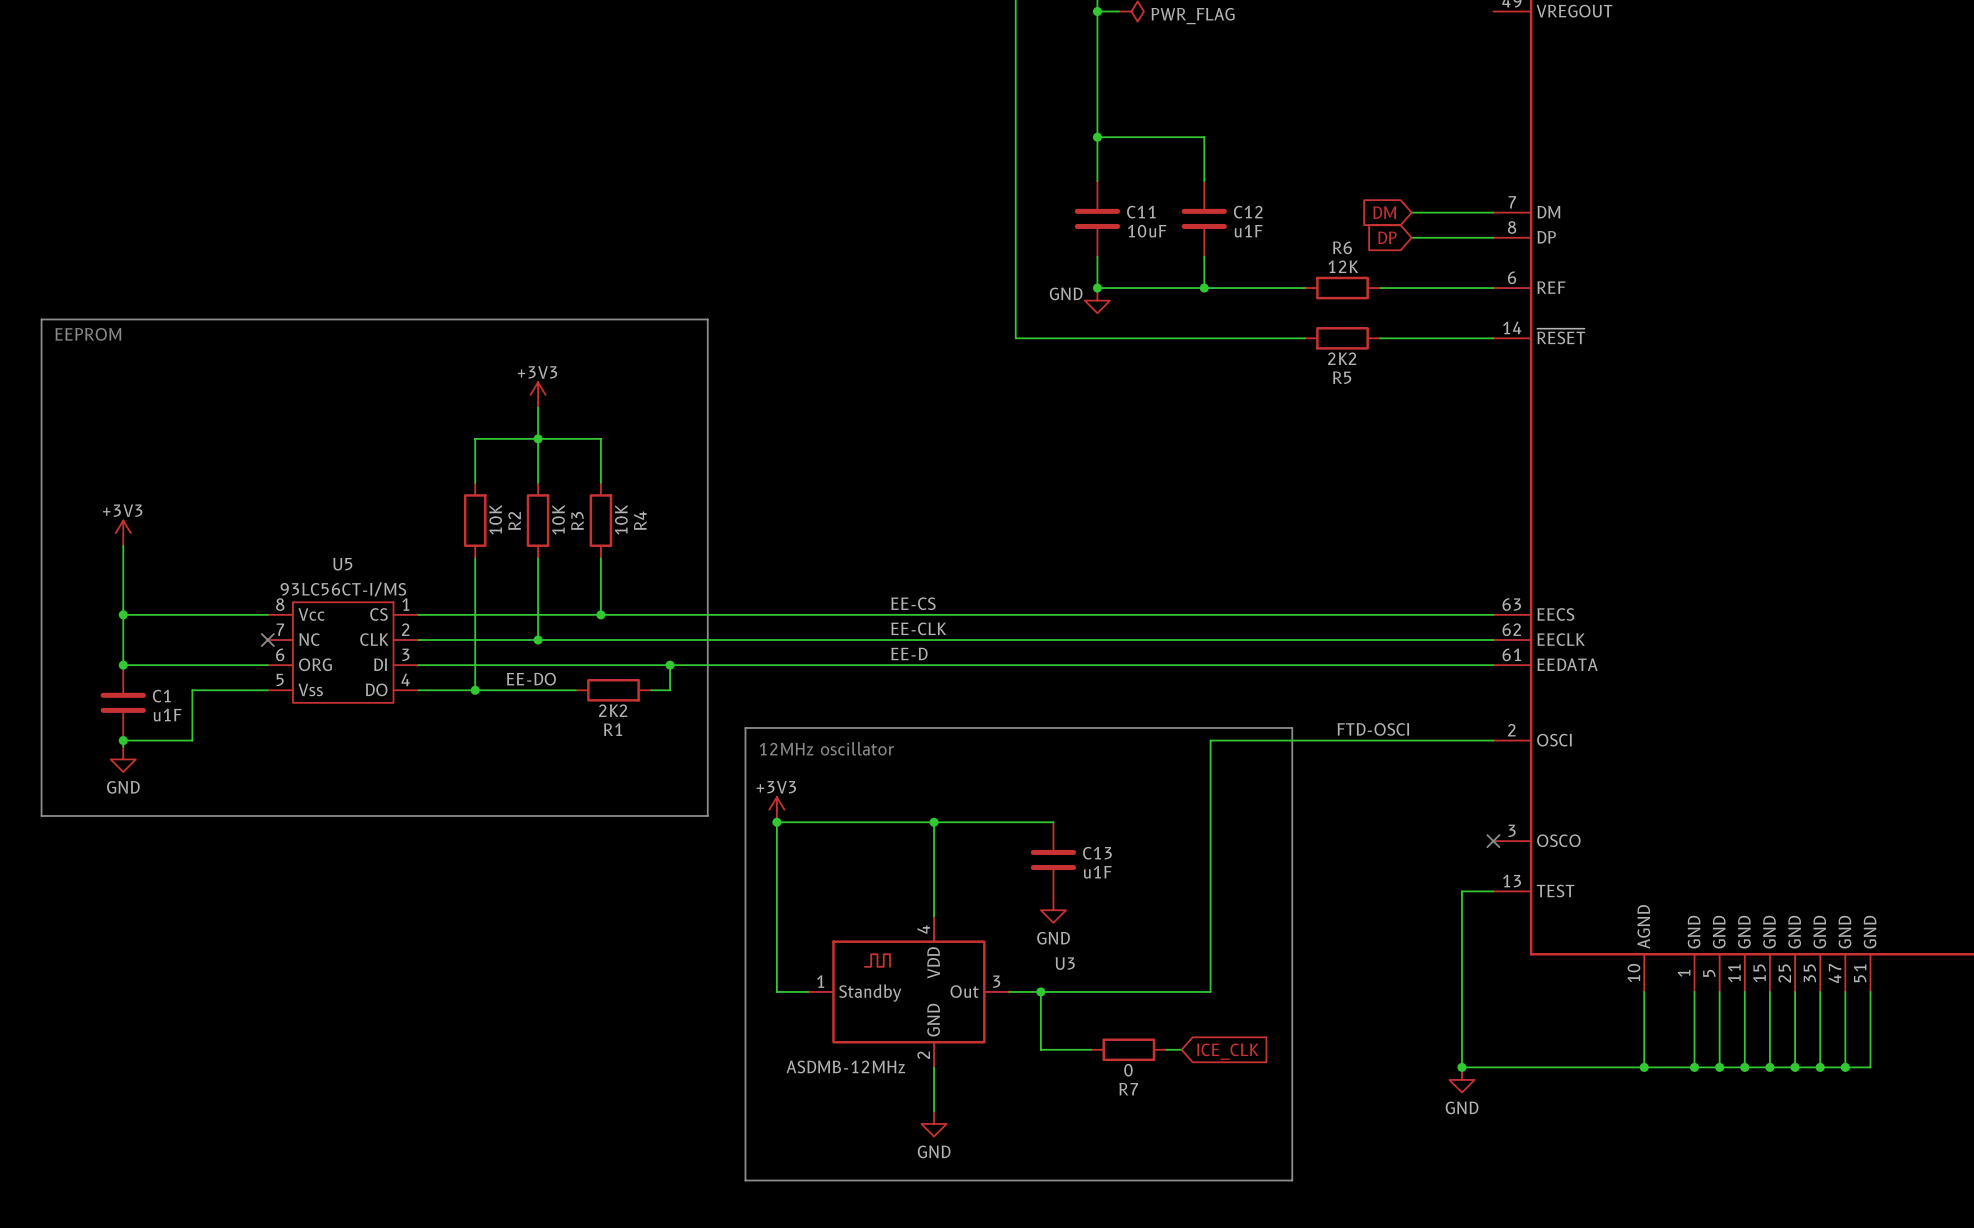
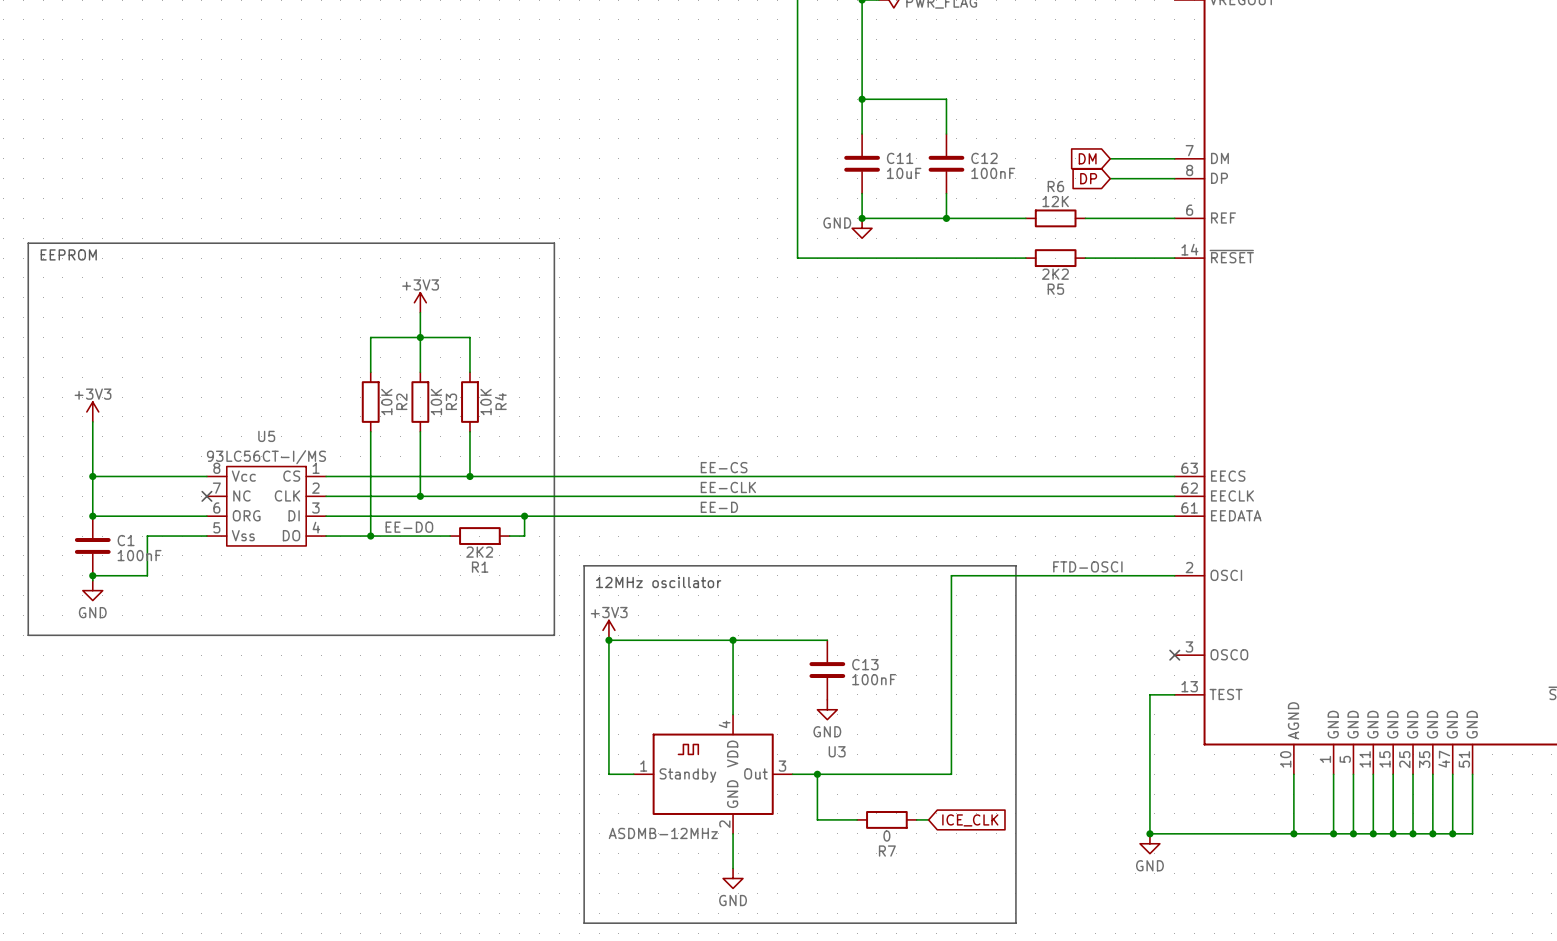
C12 value: u1F (1248, 231) -> 100nF (993, 173)
C1 value: u1F (167, 715) -> 100nF (139, 555)
C13 value: u1F (1097, 872) -> 100nF (874, 679)

